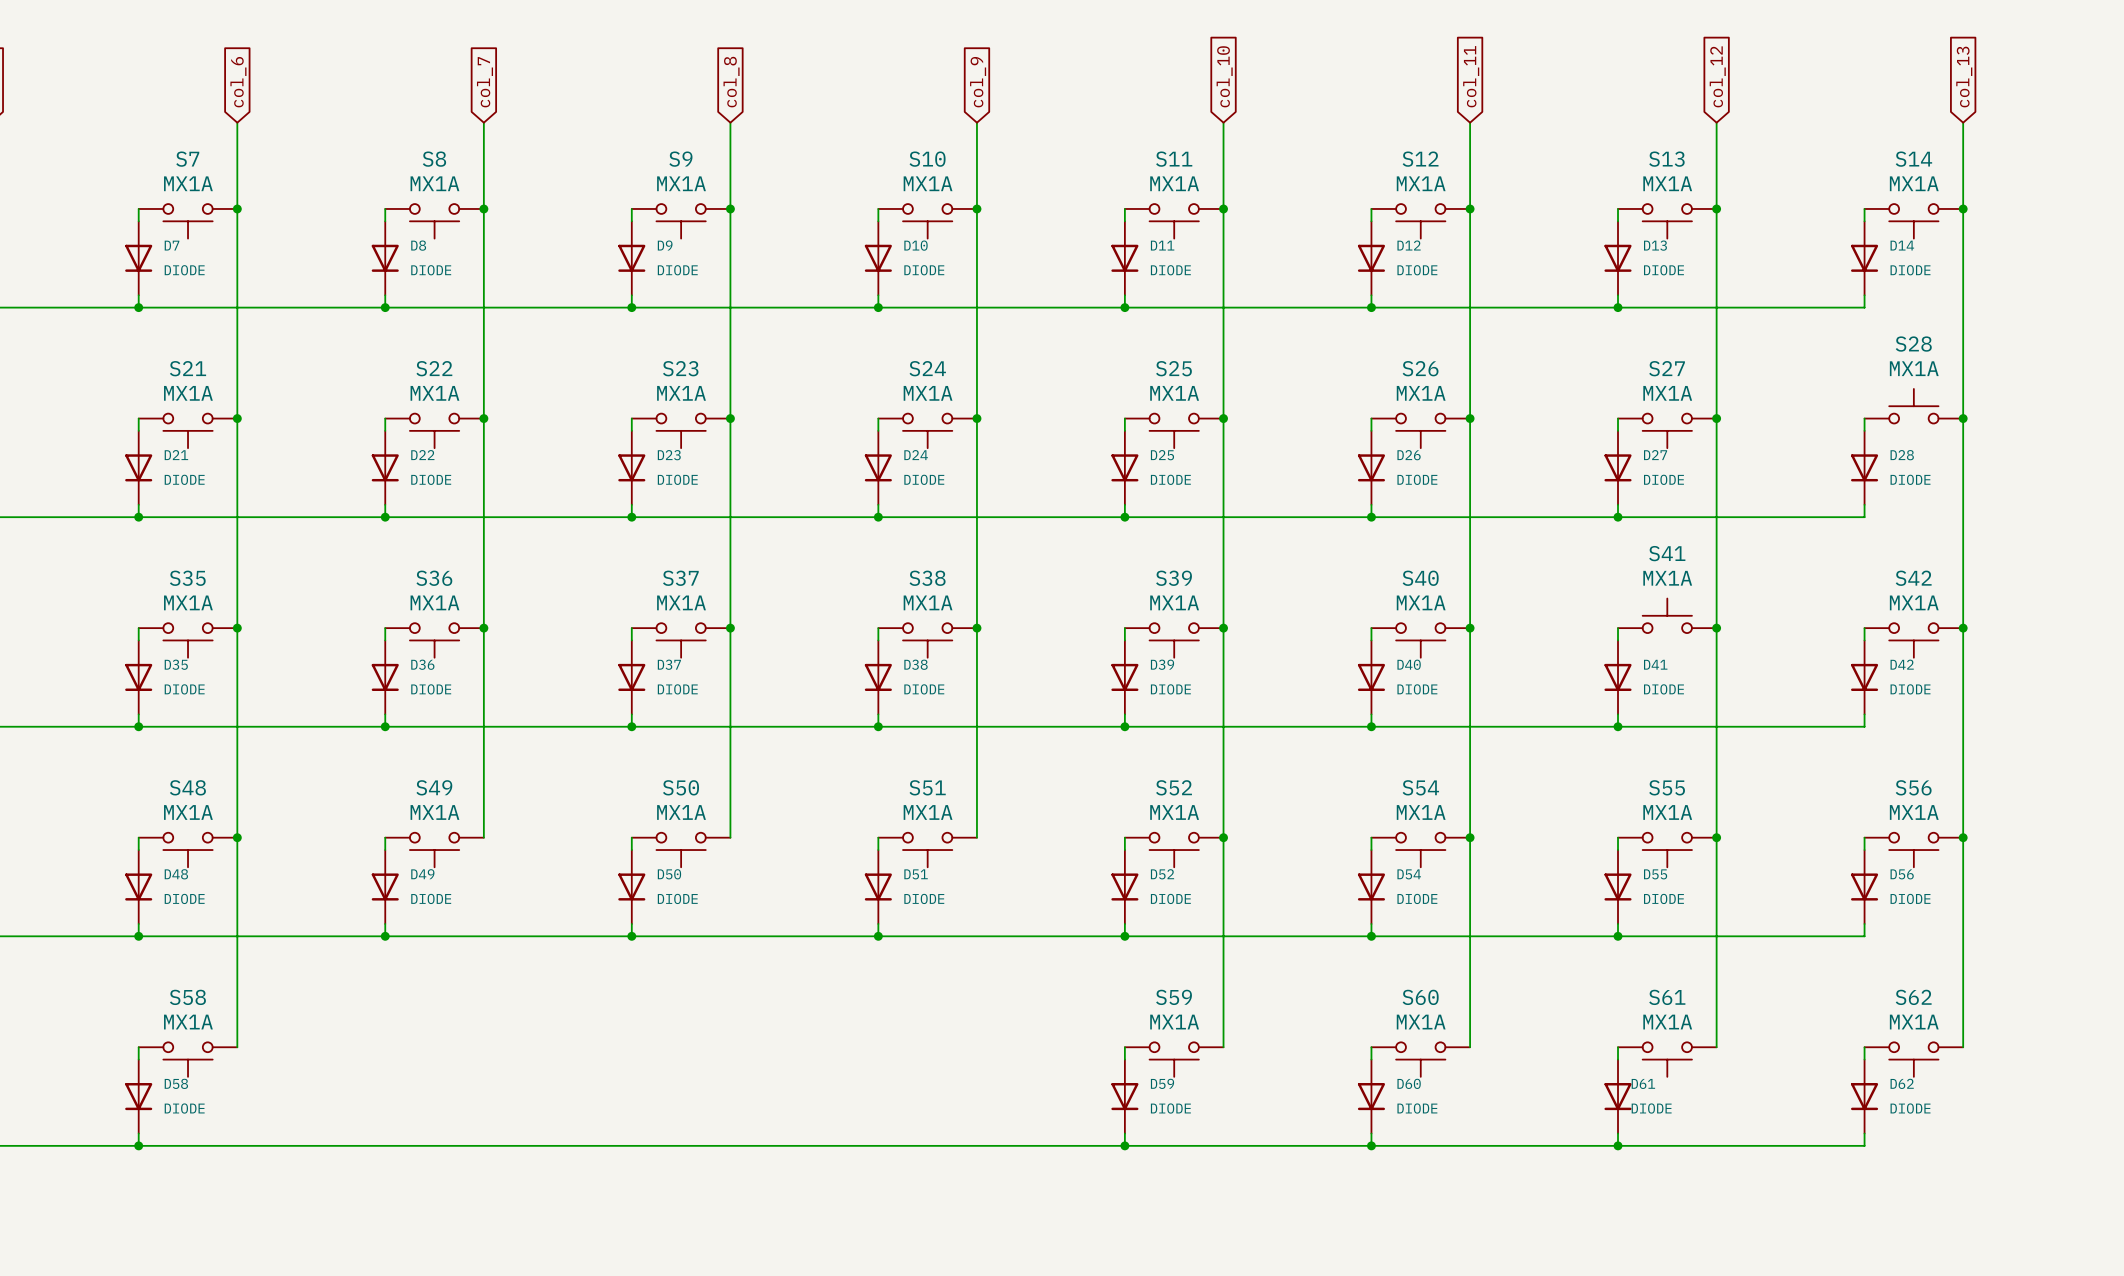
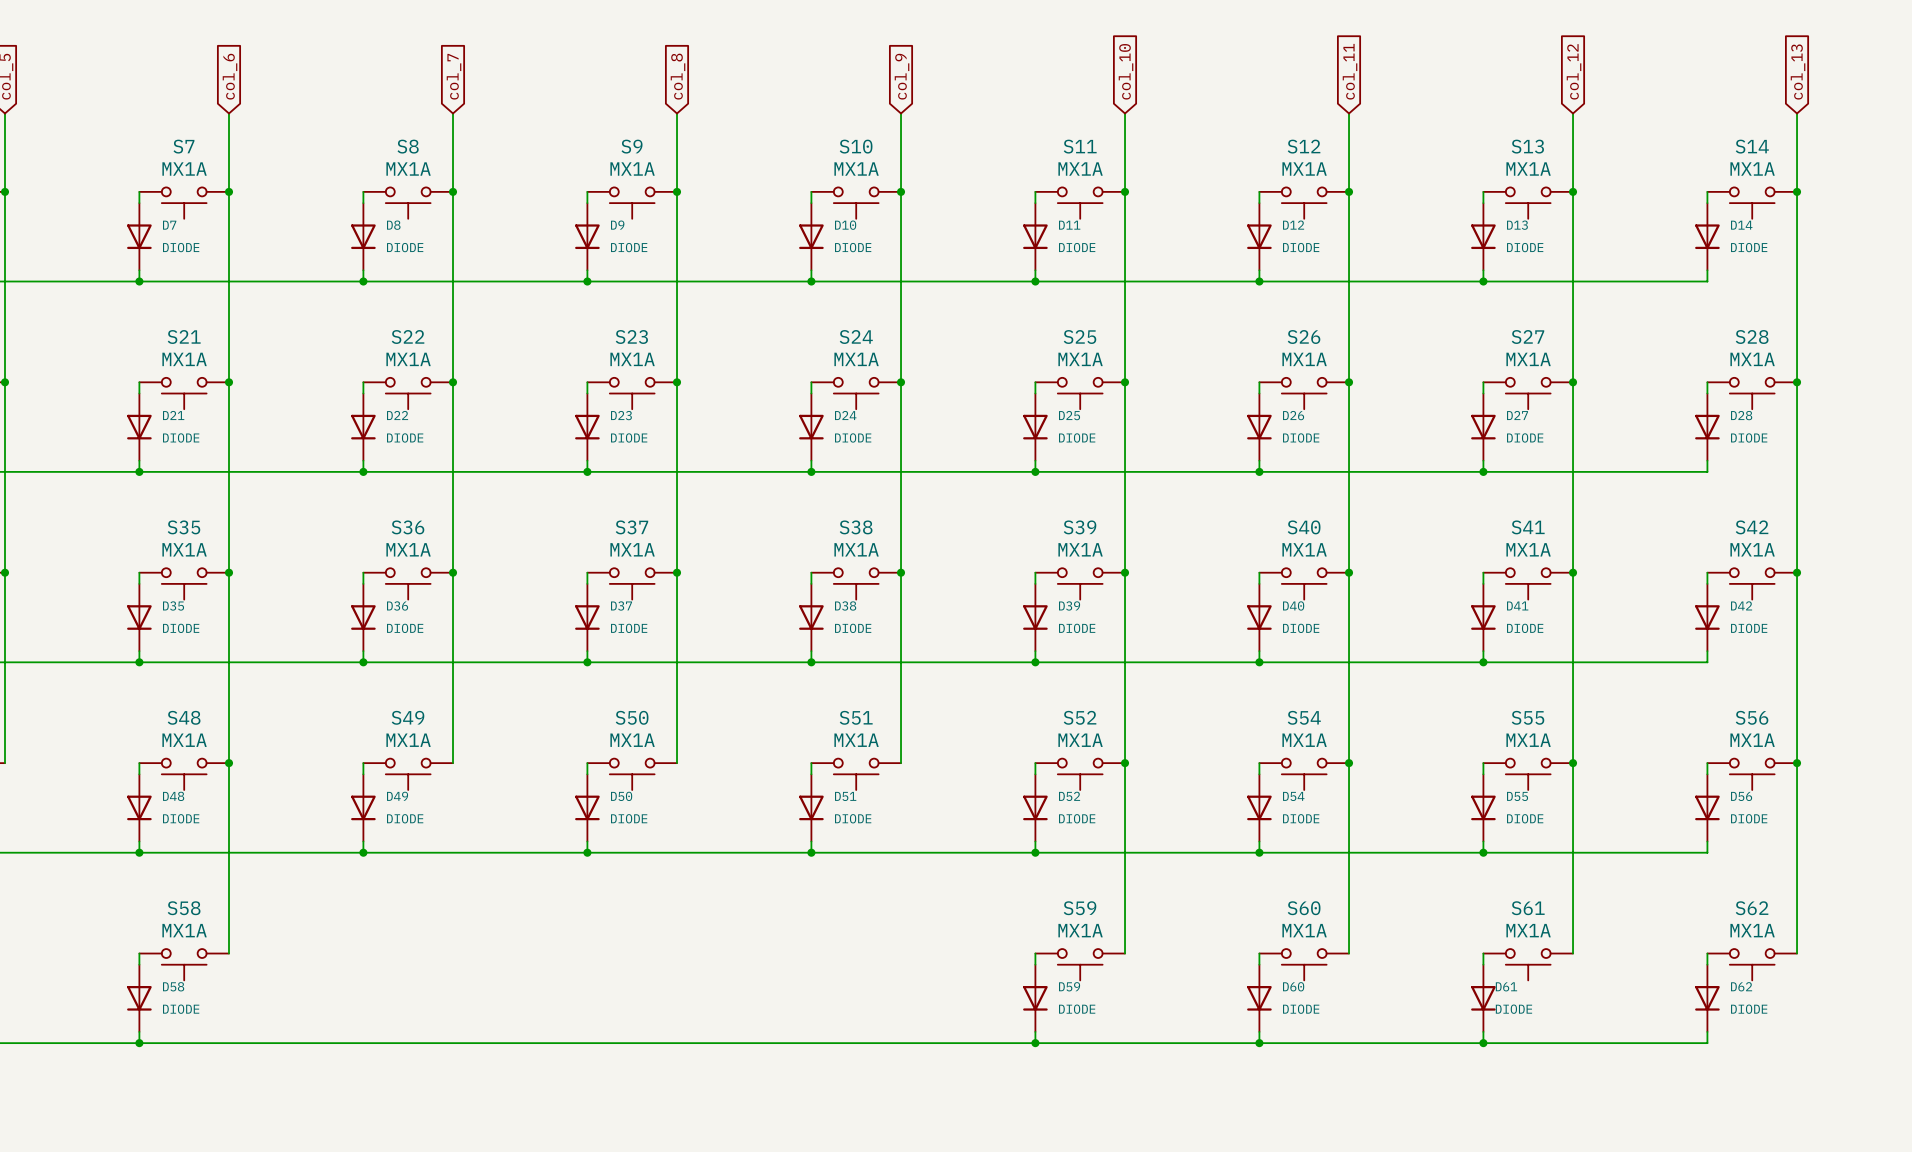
S28 rotation: 0° (1913, 406) -> 180° (1752, 393)
S41 rotation: 0° (1667, 615) -> 180° (1528, 583)

